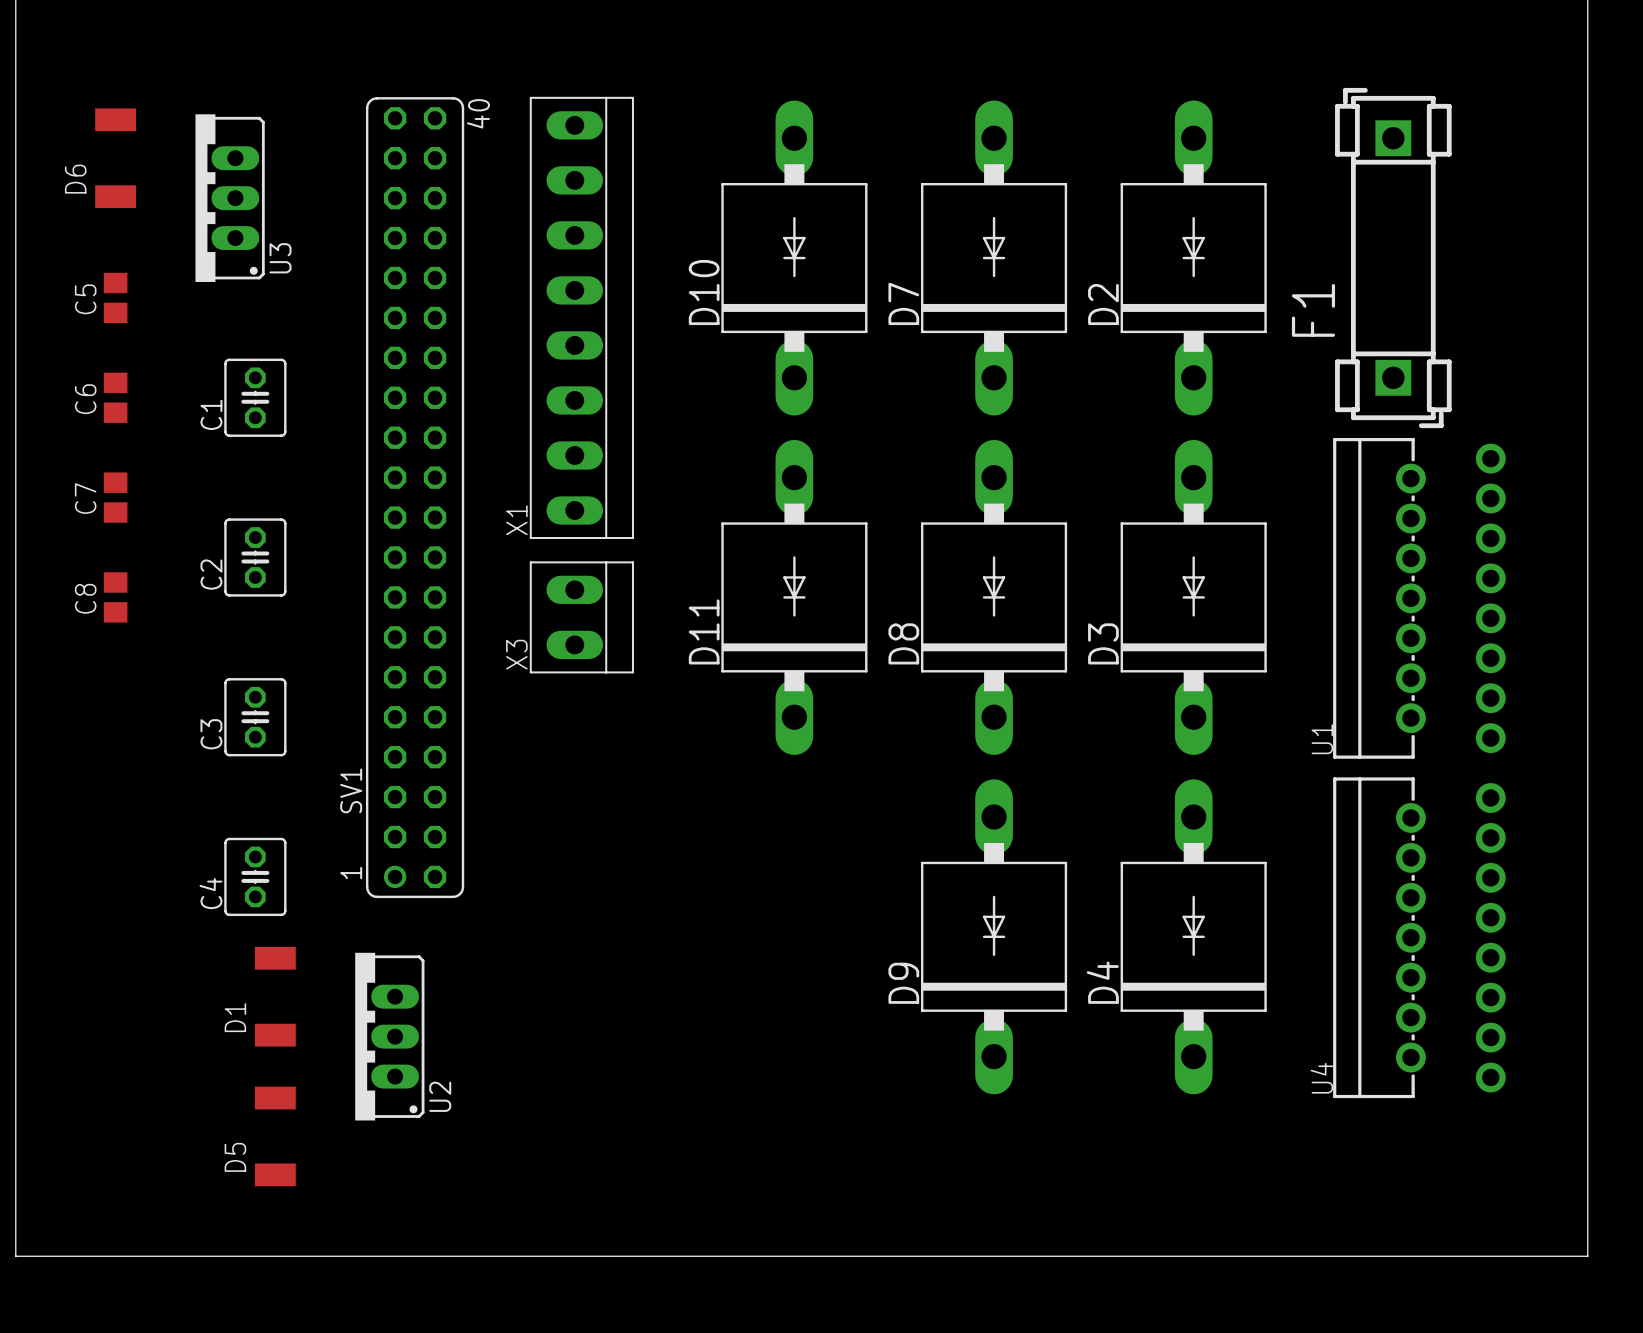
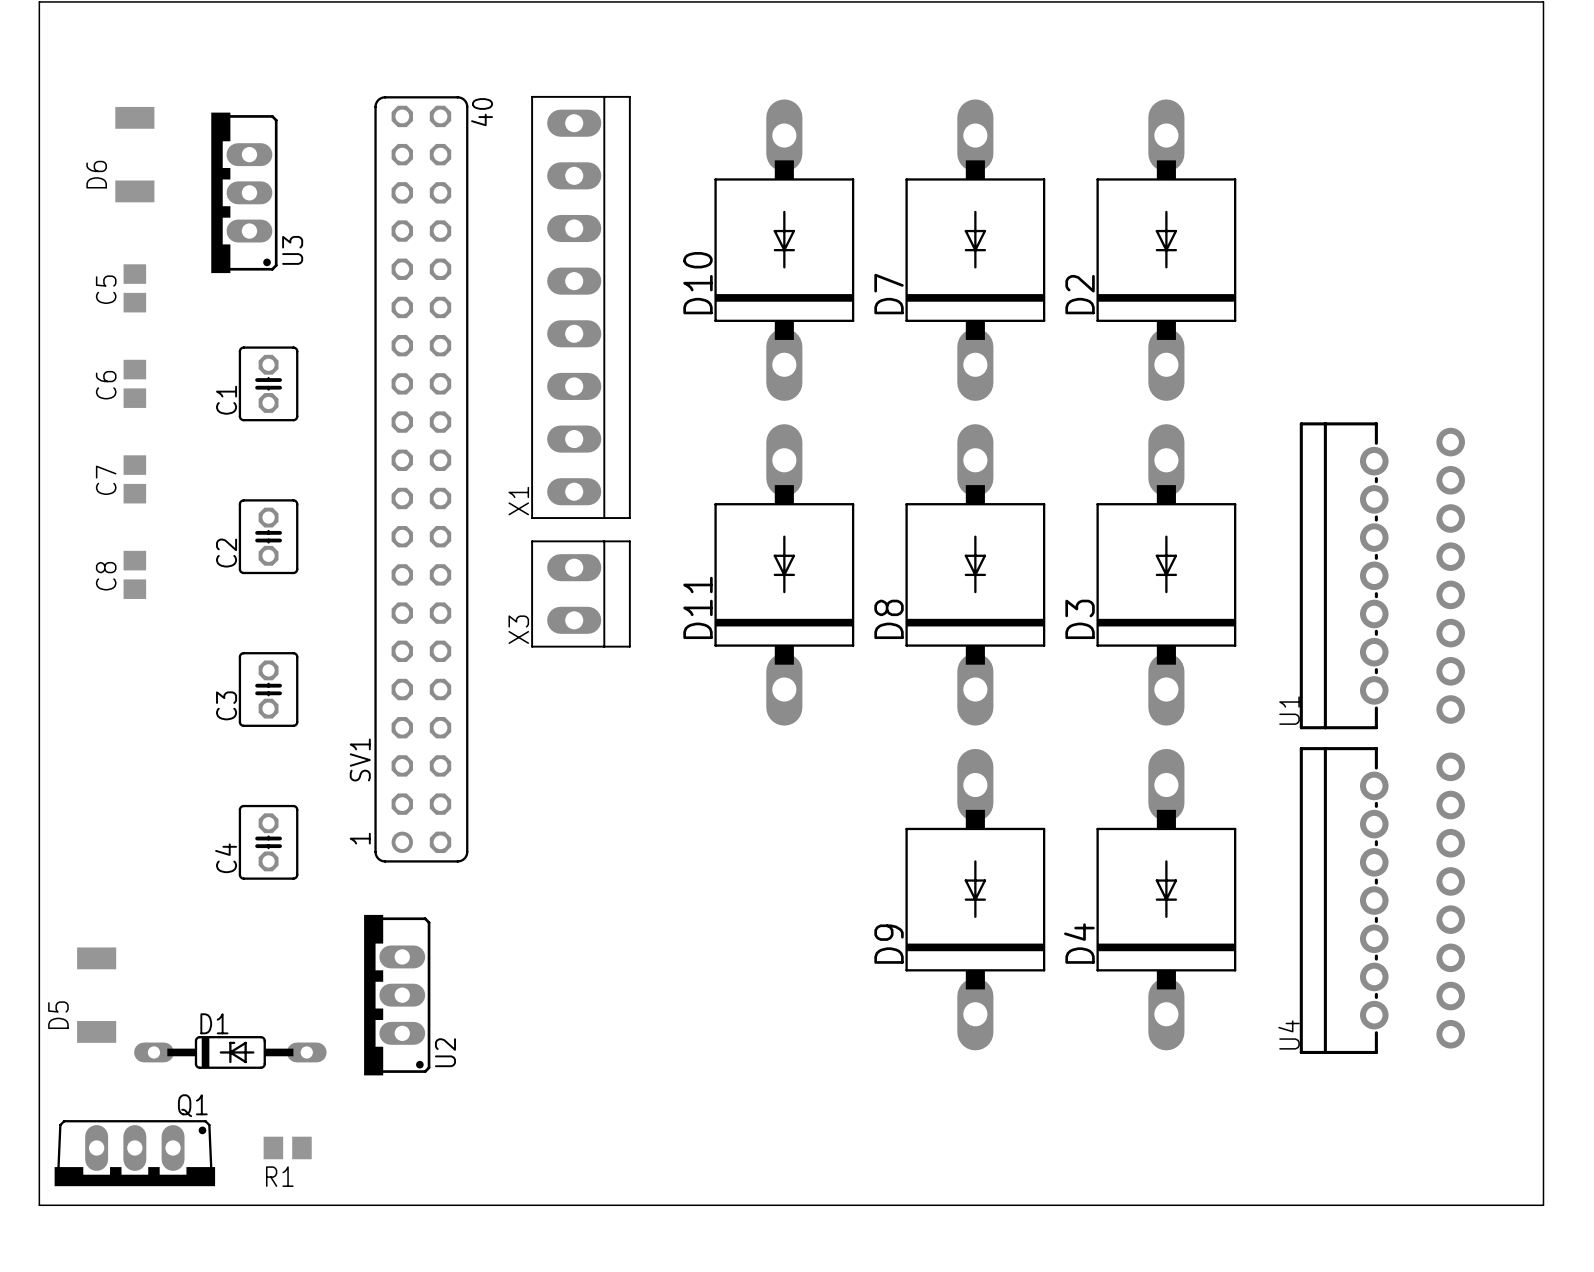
F1: (1393, 258) -> none
D1 footprint: [254, 946, 296, 1047] -> [134, 1036, 327, 1069]
D1 name position: D1 (235, 1017) -> D1 (214, 1023)
D5 position: (275, 1136) -> (96, 995)
R1: none -> (287, 1147)
Q1: none -> (134, 1153)

